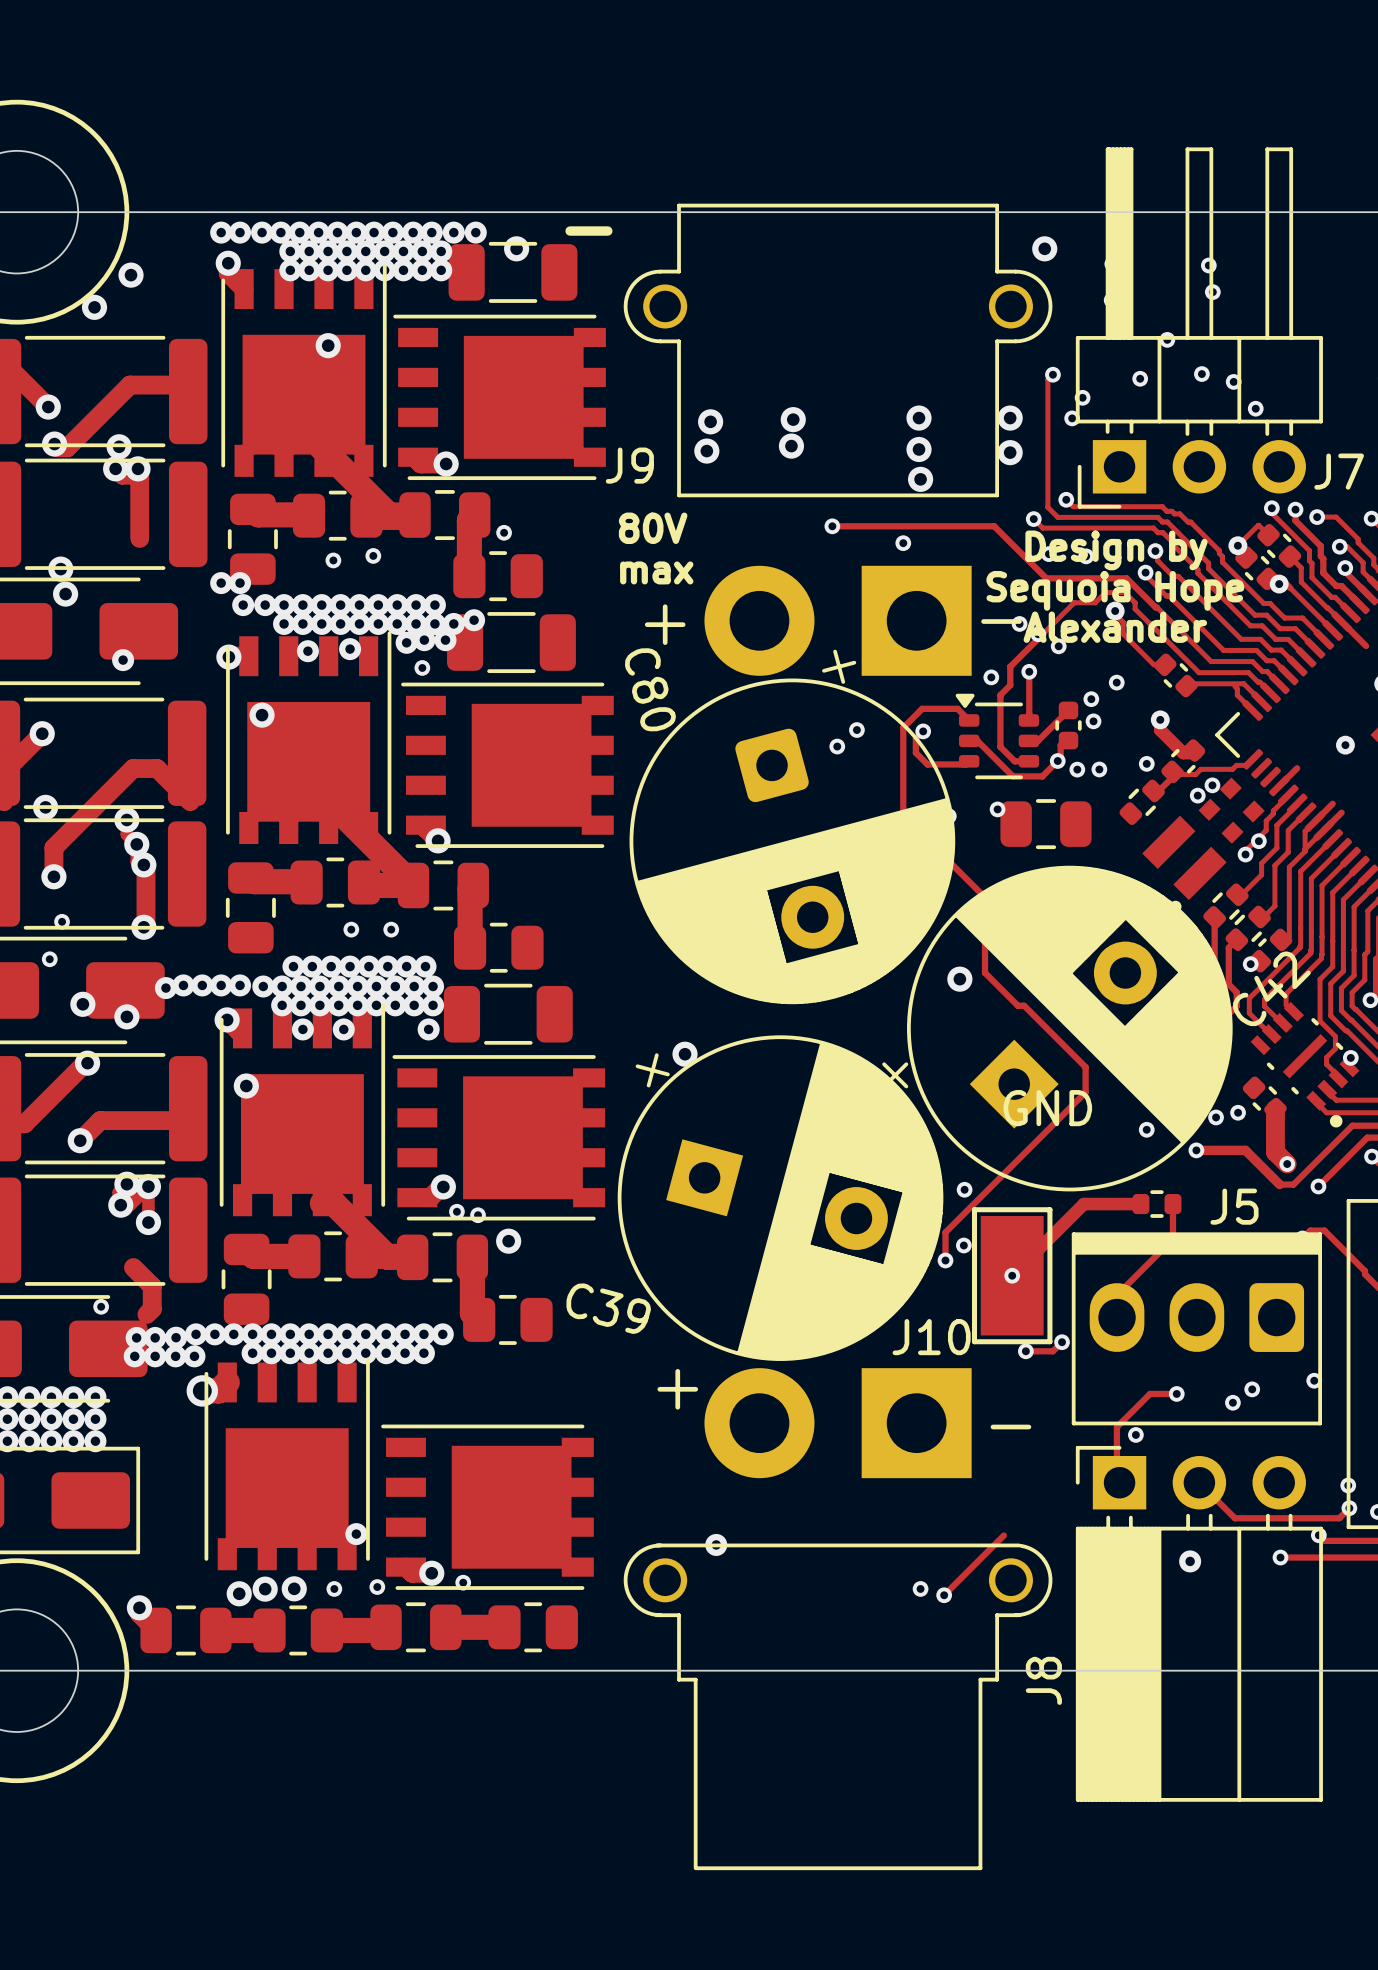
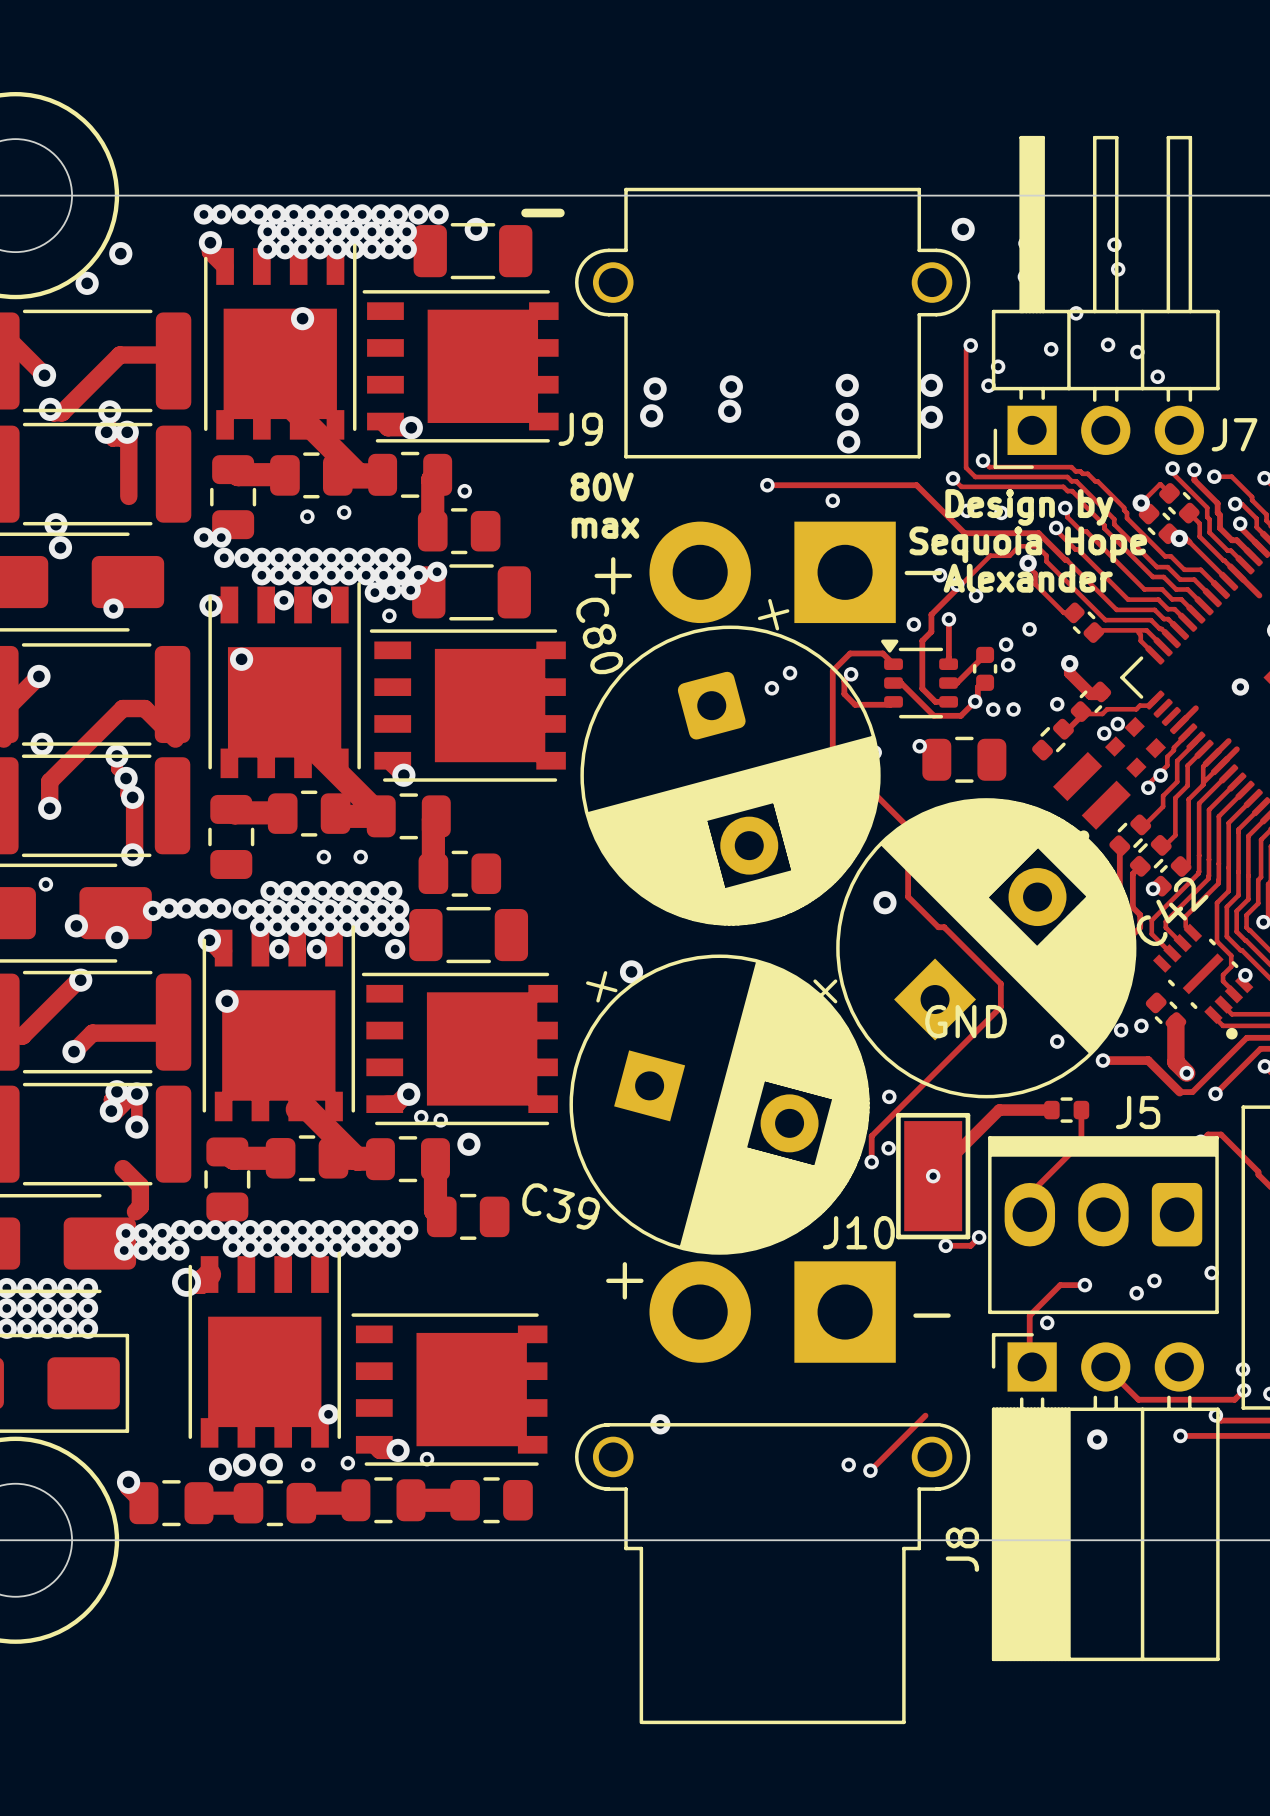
via: (62, 921) -> none
via: (101, 1306) -> none

